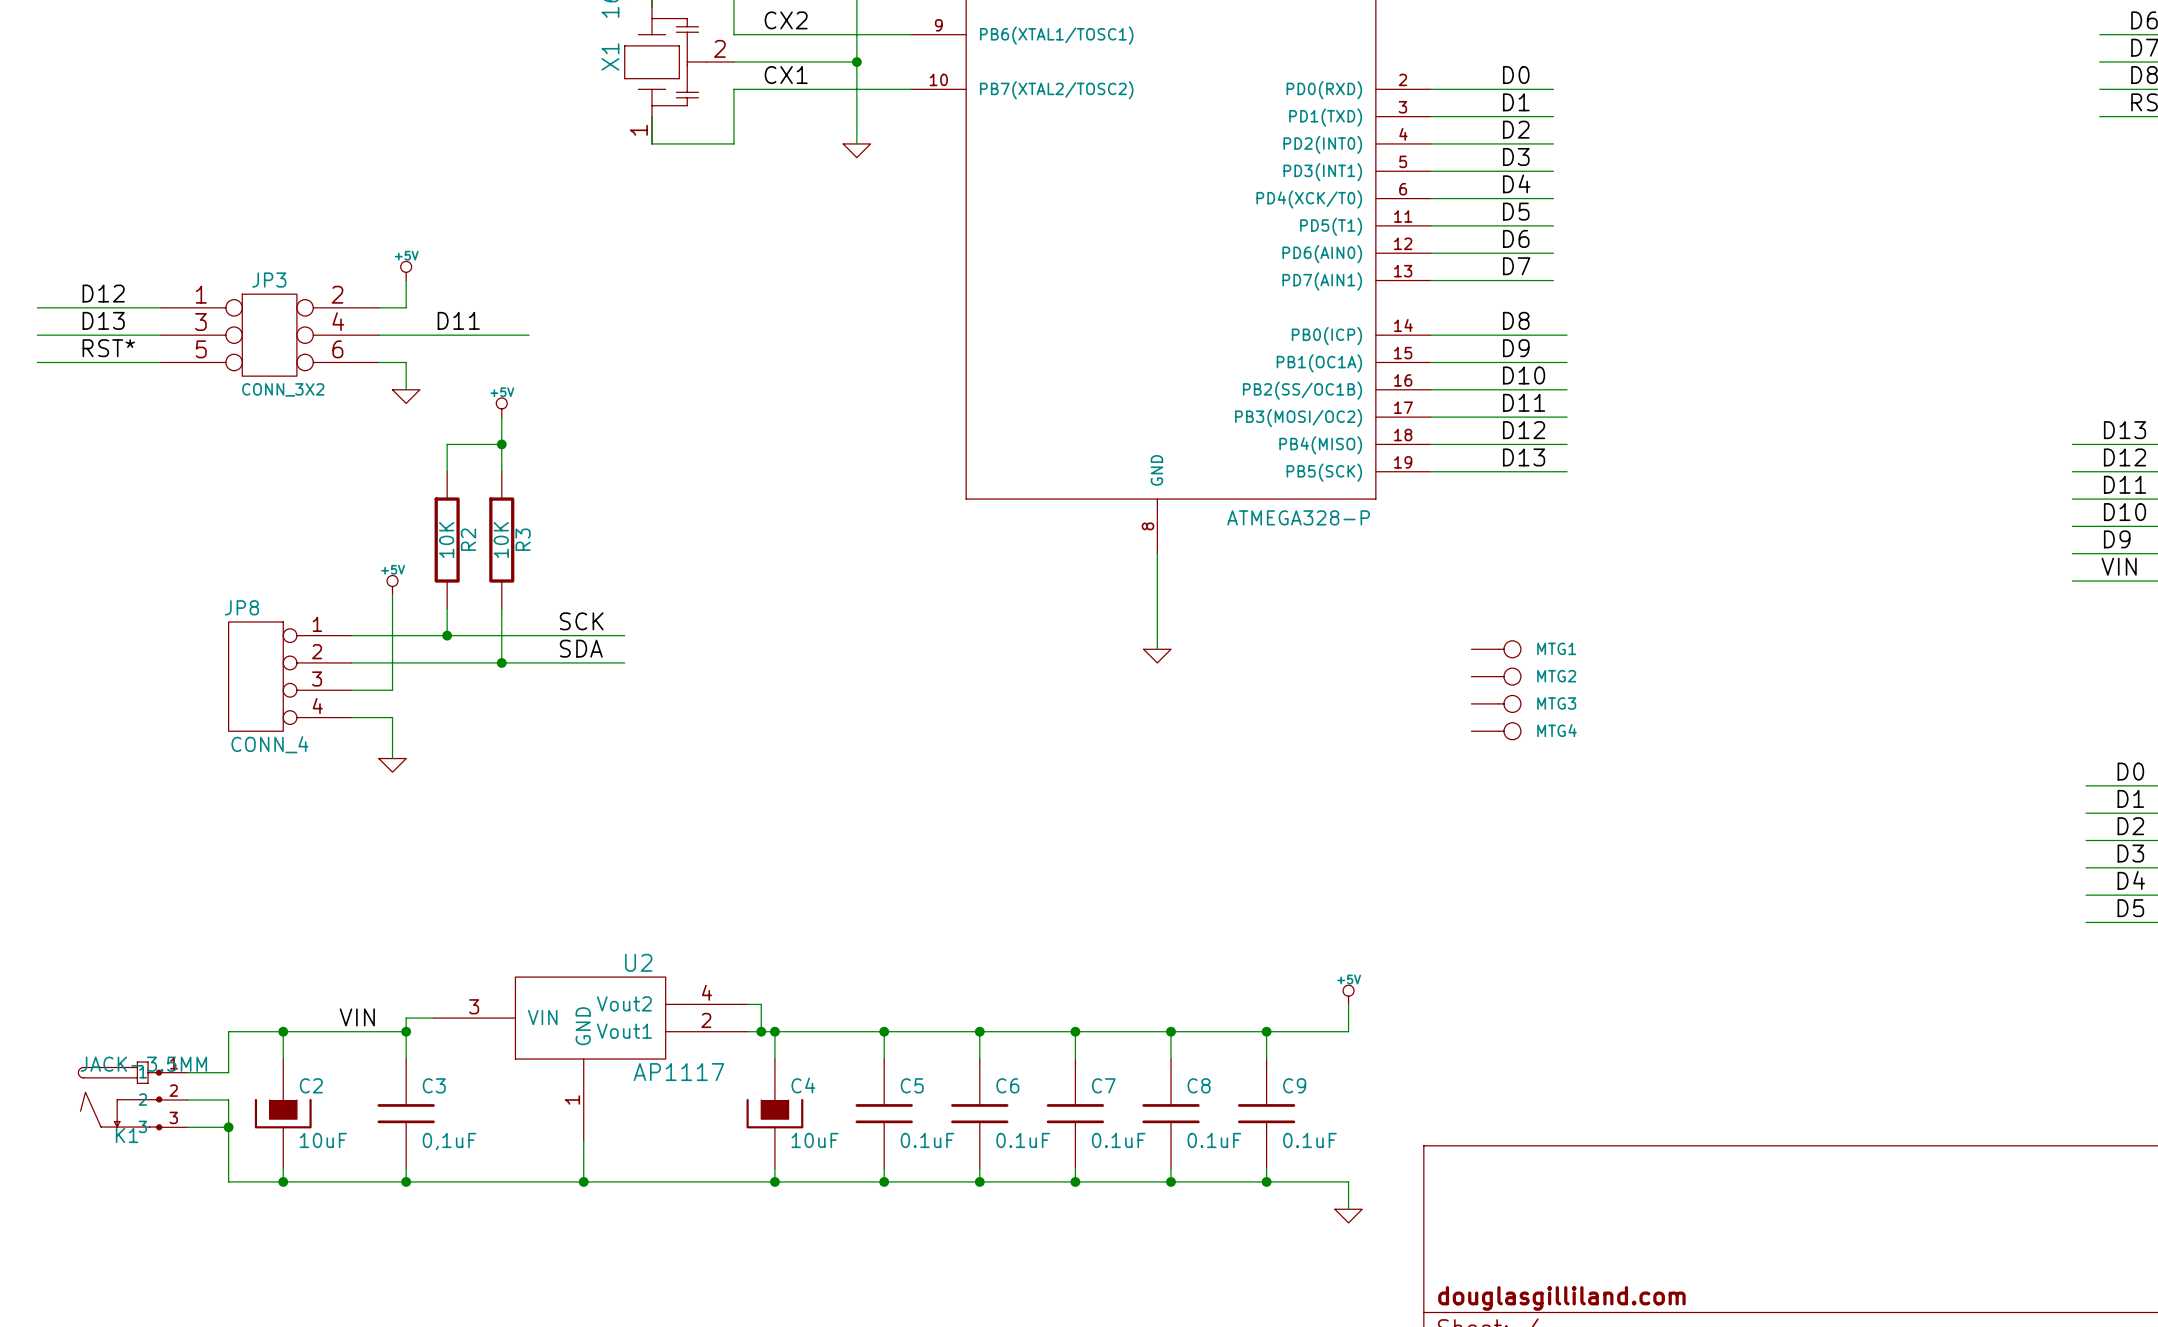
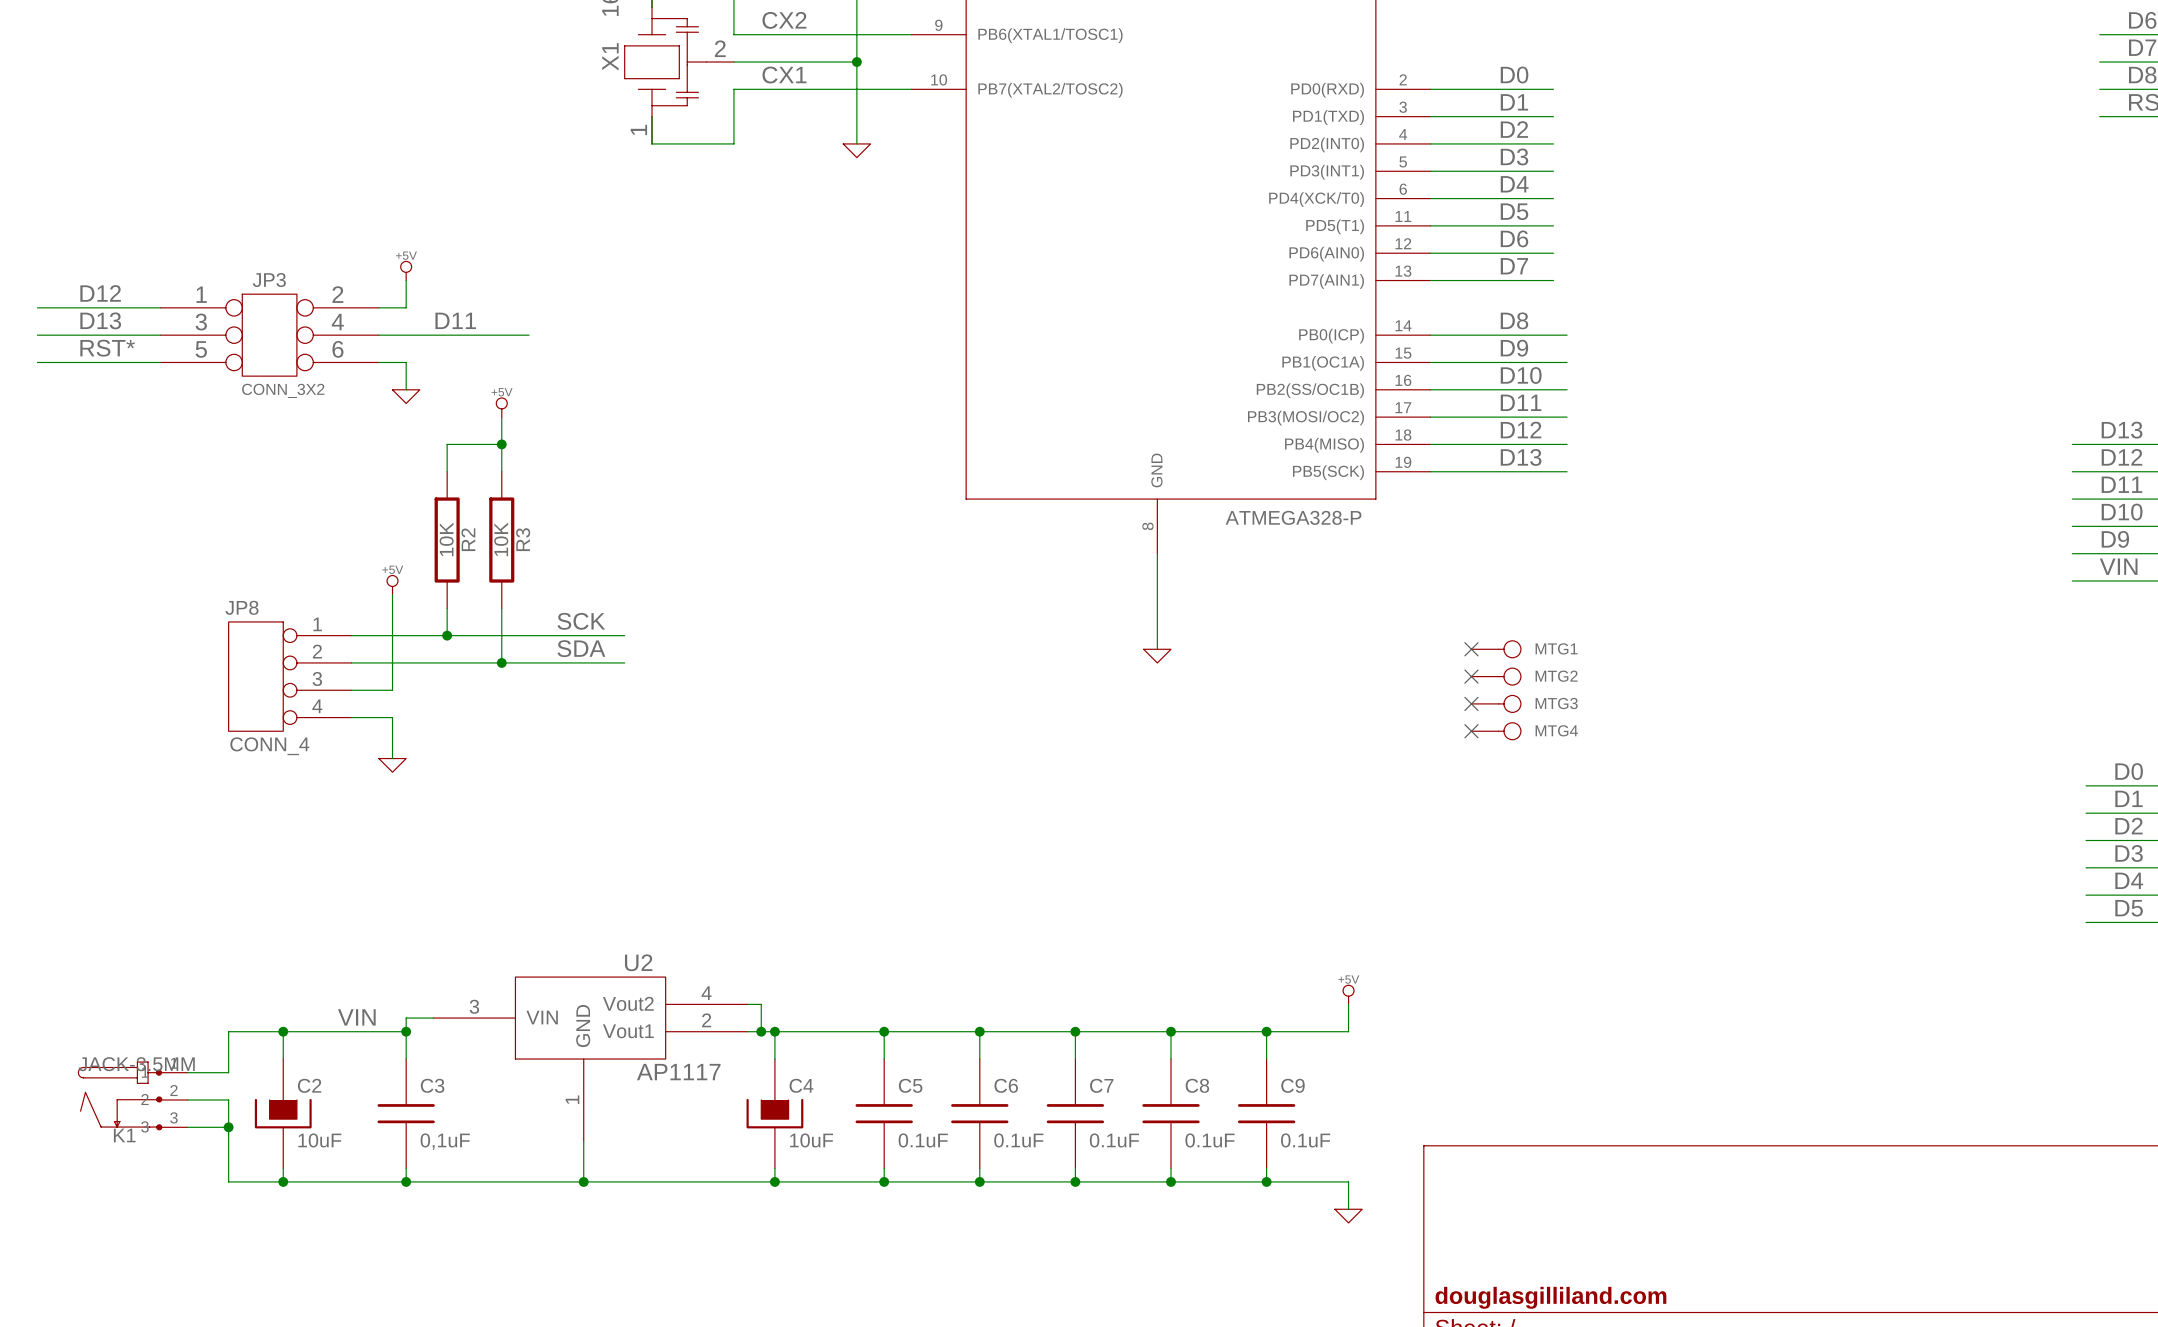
no-connect mark: none -> (1471, 649)
no-connect mark: none -> (1471, 676)
no-connect mark: none -> (1471, 703)
no-connect mark: none -> (1471, 731)

